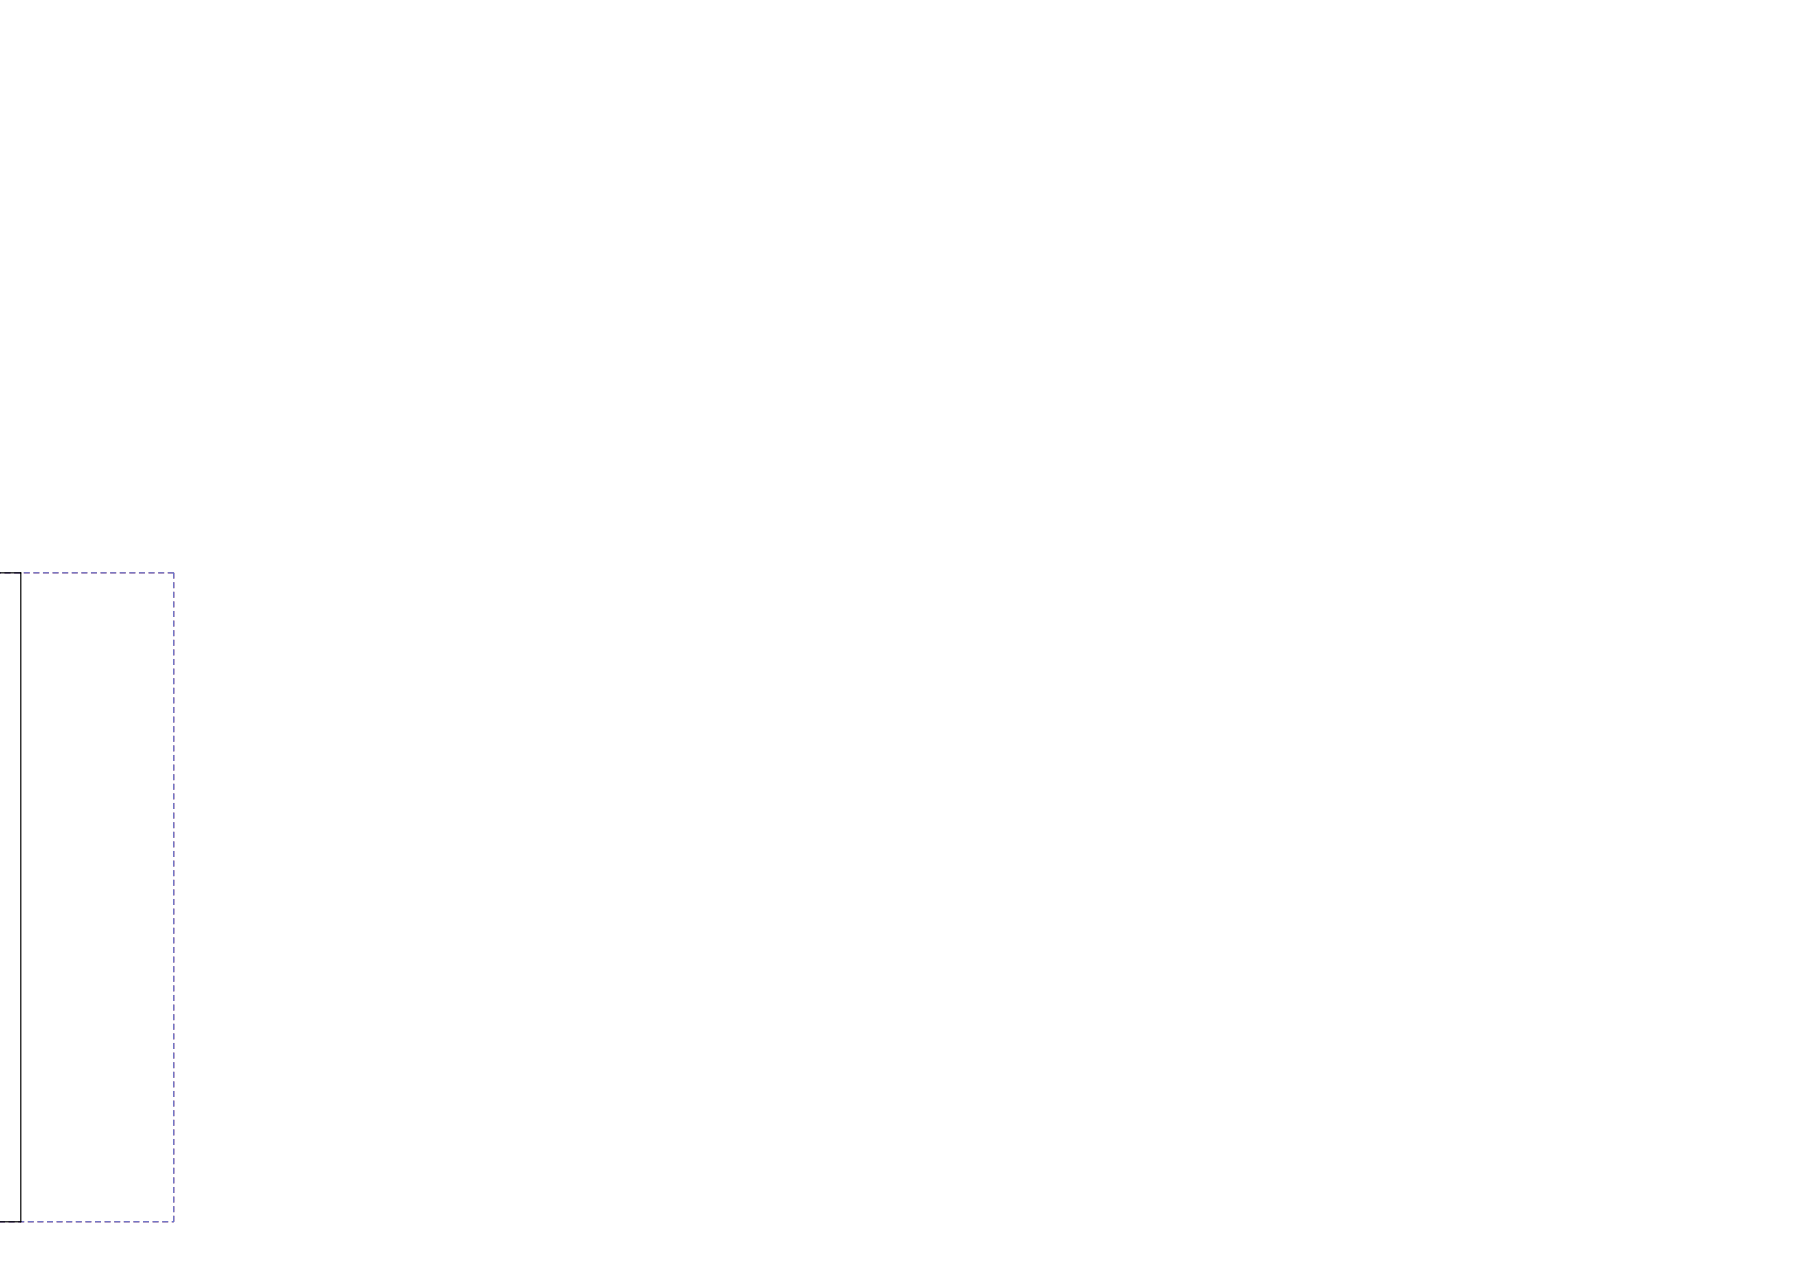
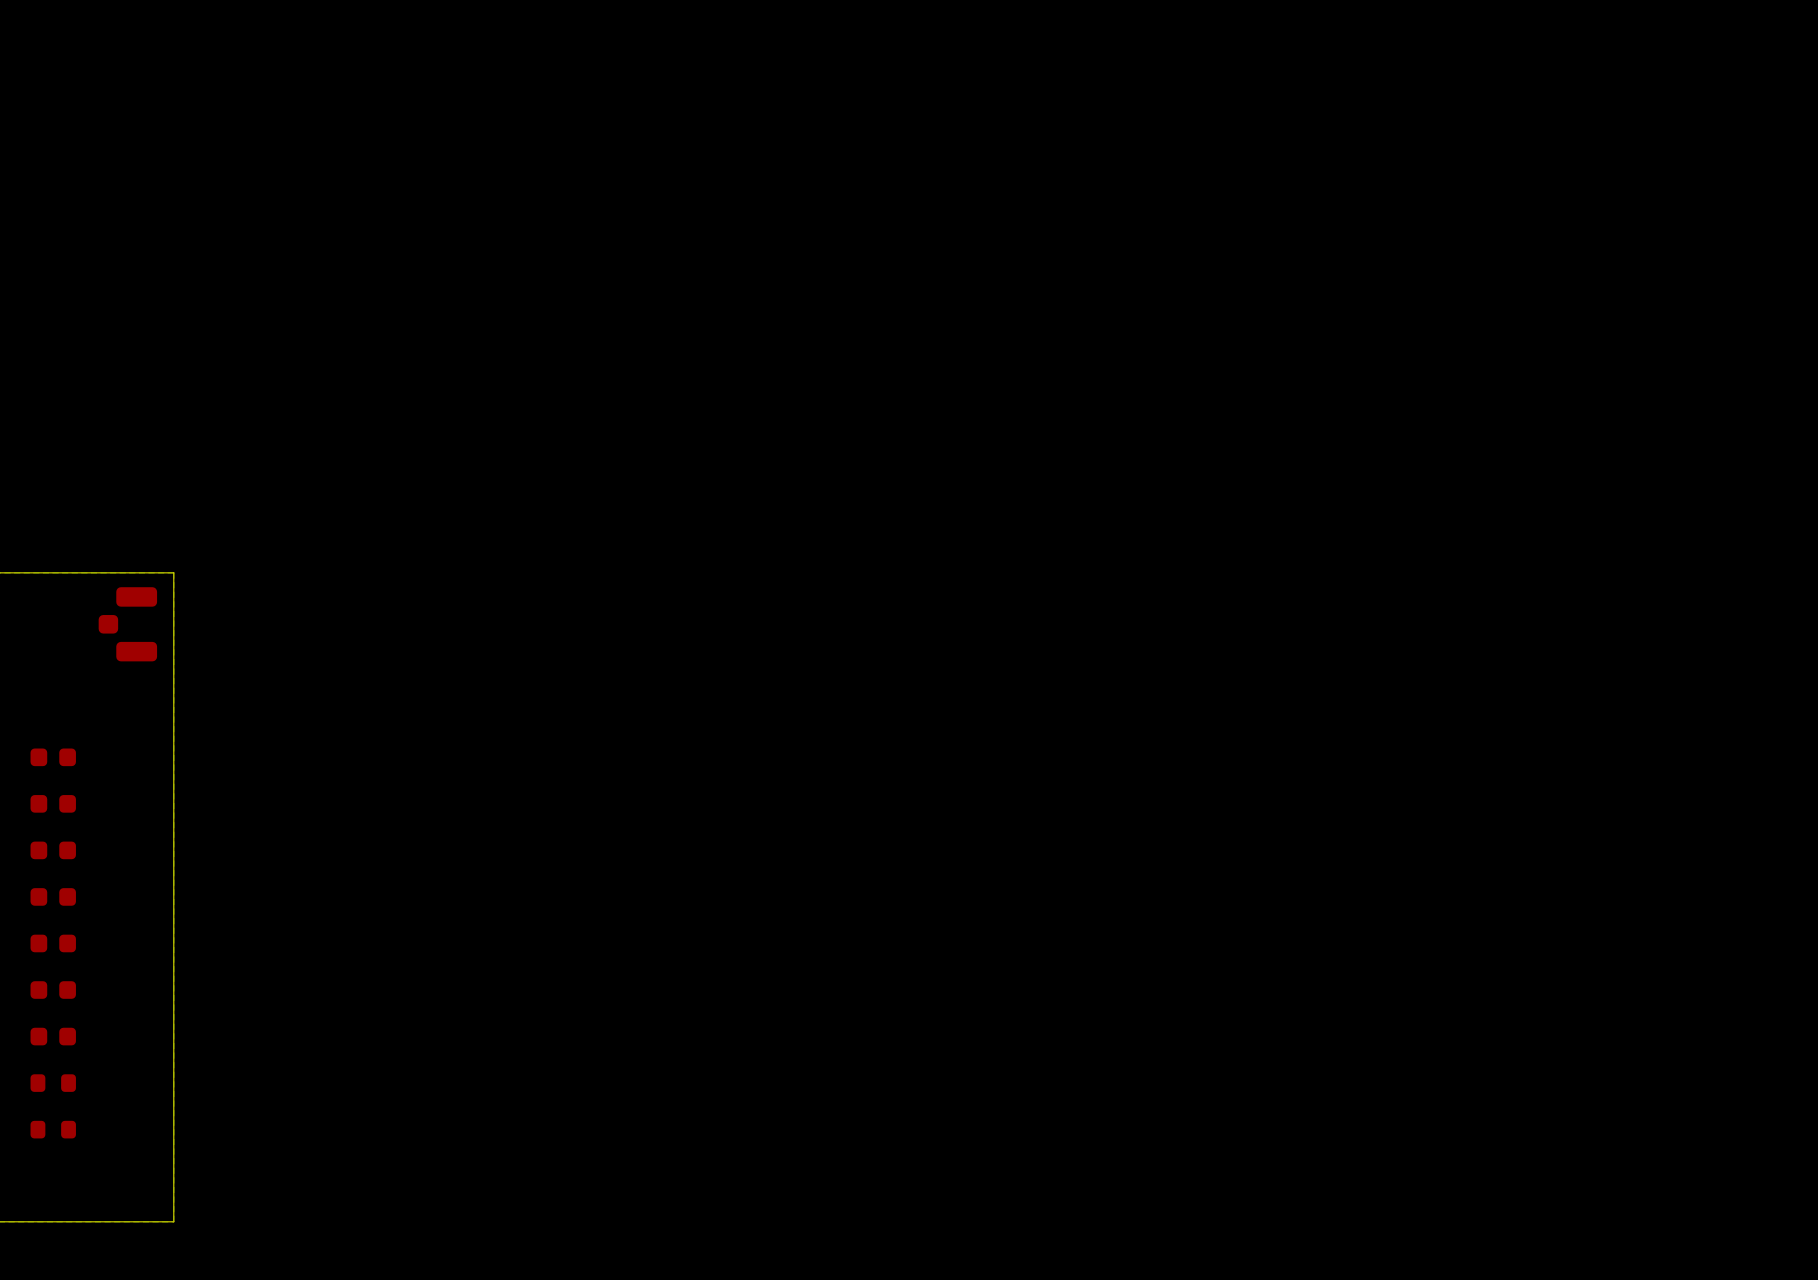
board edge: (20, 572) (20, 1221) -> (20, 572) (173, 572) (173, 1221) (20, 1221)
part: none -> (127, 624)
part: none -> (53, 757)
part: none -> (53, 803)
part: none -> (53, 850)
part: none -> (53, 896)
part: none -> (53, 943)
part: none -> (53, 990)
part: none -> (53, 1036)
part: none -> (53, 1083)
part: none -> (53, 1129)

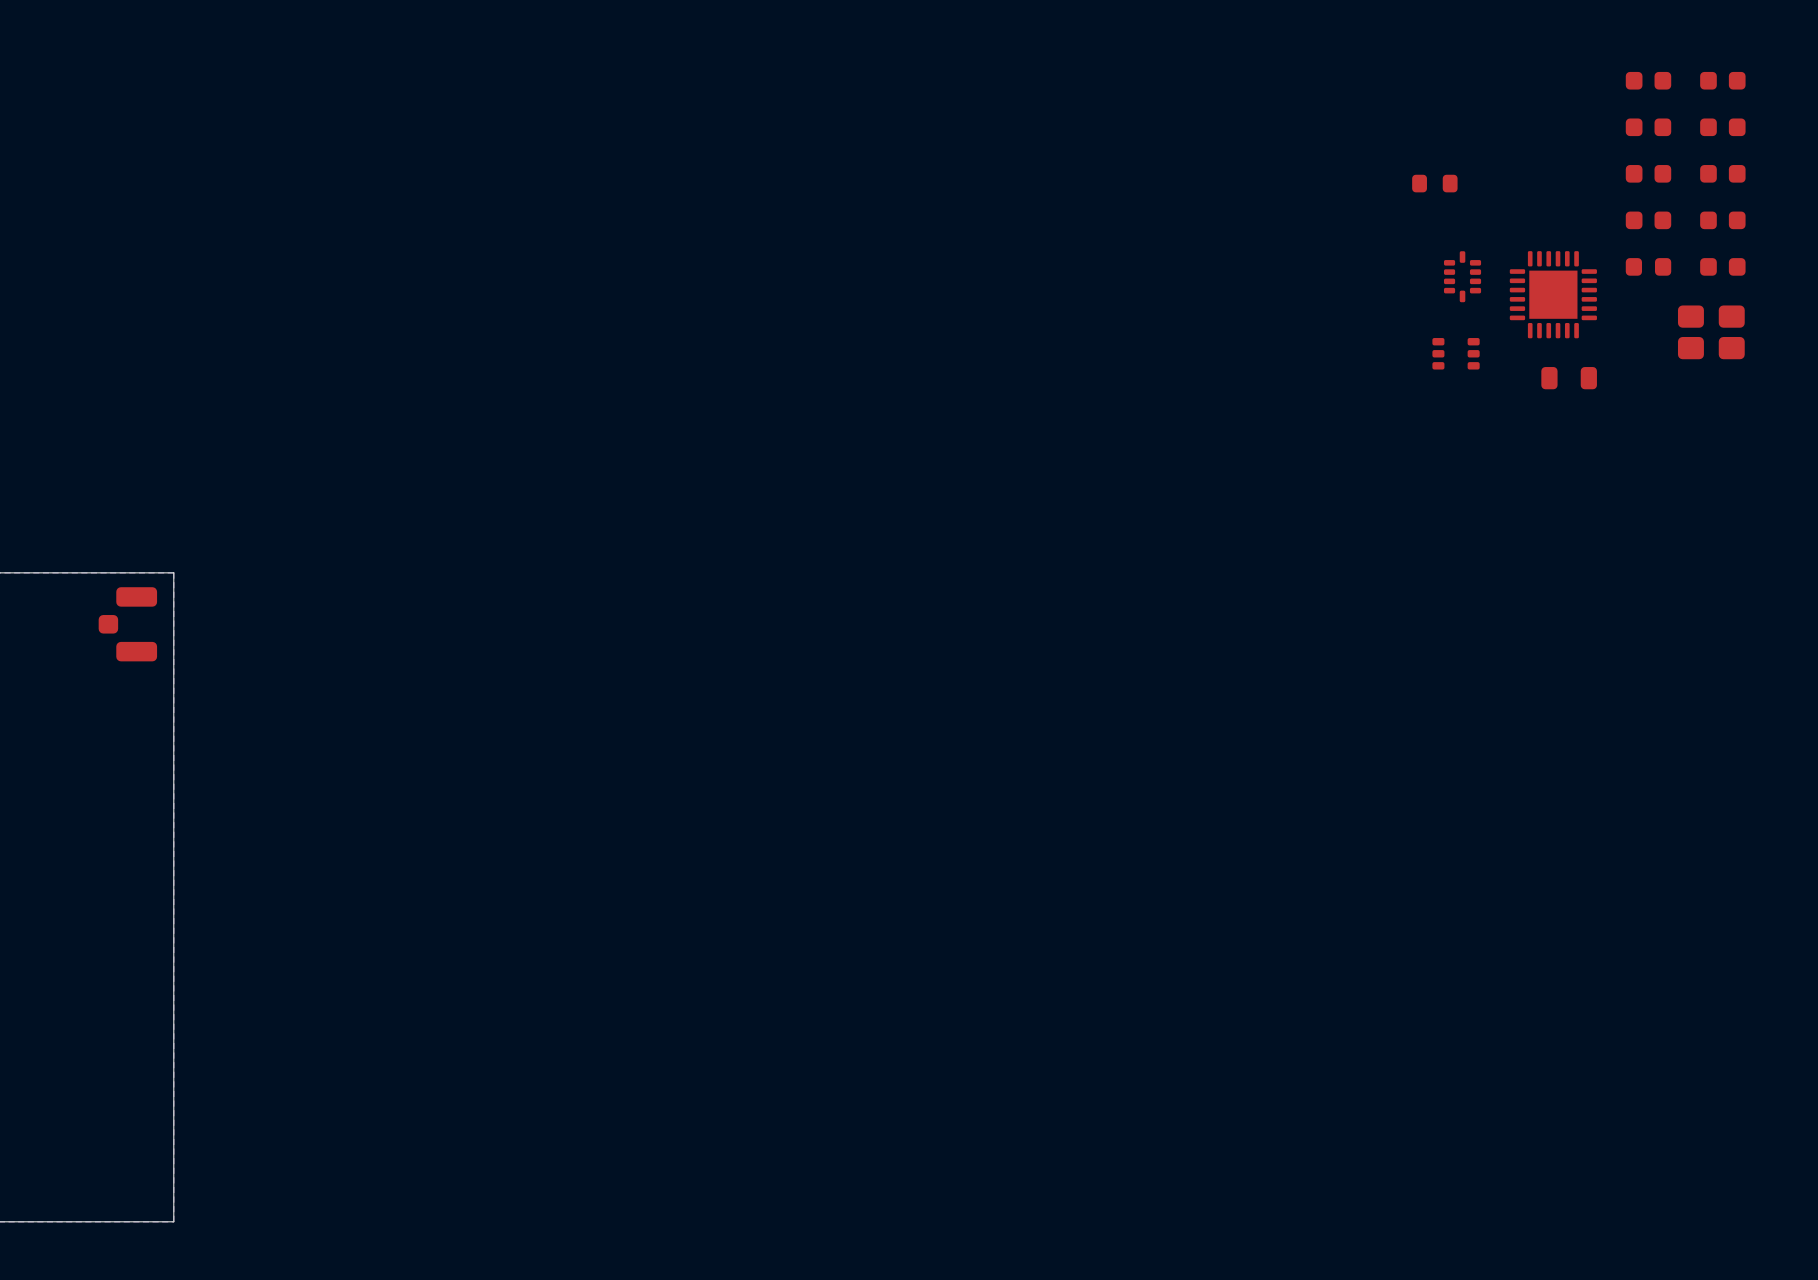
part: none -> (1648, 80)
part: none -> (1722, 80)
part: none -> (1648, 127)
part: none -> (1722, 127)
part: none -> (1648, 173)
part: none -> (1722, 173)
part: none -> (1434, 183)
part: none -> (1648, 220)
part: none -> (1722, 220)
part: none -> (1648, 266)
part: none -> (1722, 266)
part: none -> (1462, 276)
part: none -> (1553, 294)
part: none -> (1711, 332)
part: none -> (1456, 353)
part: none -> (1569, 378)
part: (53, 757) -> none
part: (53, 803) -> none
part: (53, 850) -> none
part: (53, 896) -> none
part: (53, 943) -> none
part: (53, 990) -> none
part: (53, 1036) -> none
part: (53, 1083) -> none
part: (53, 1129) -> none

